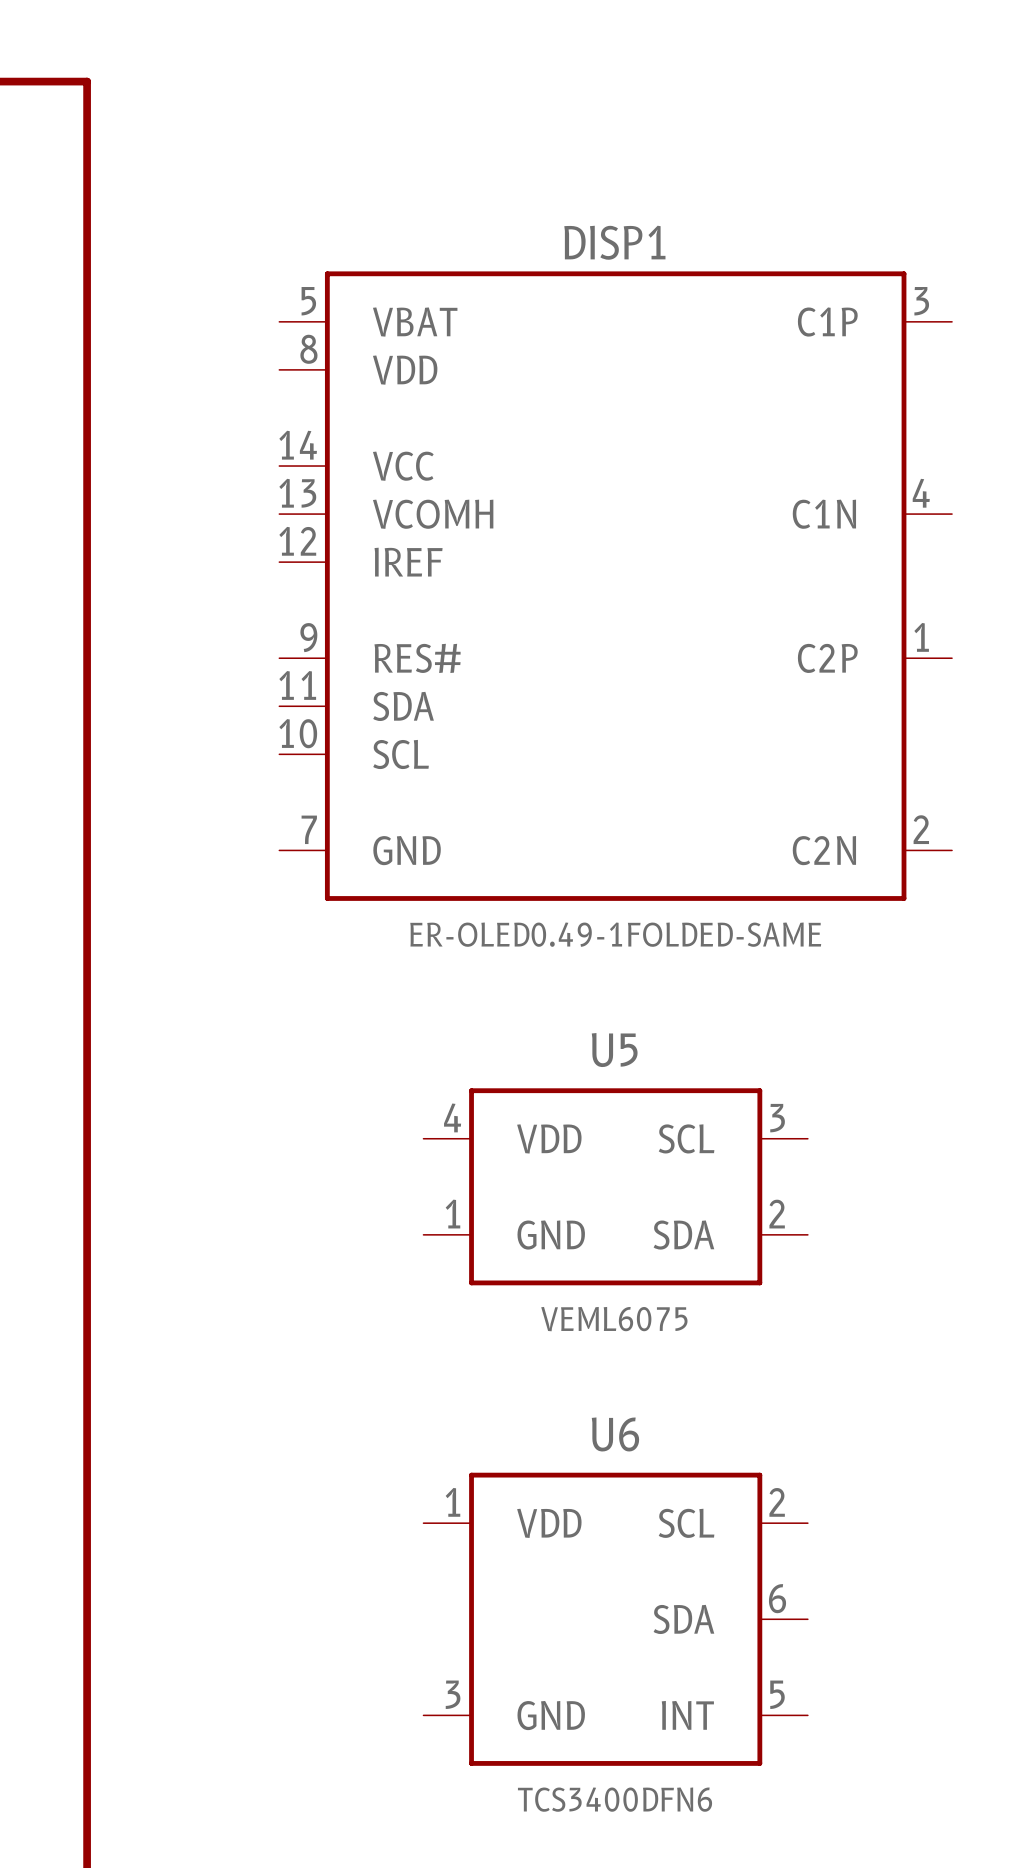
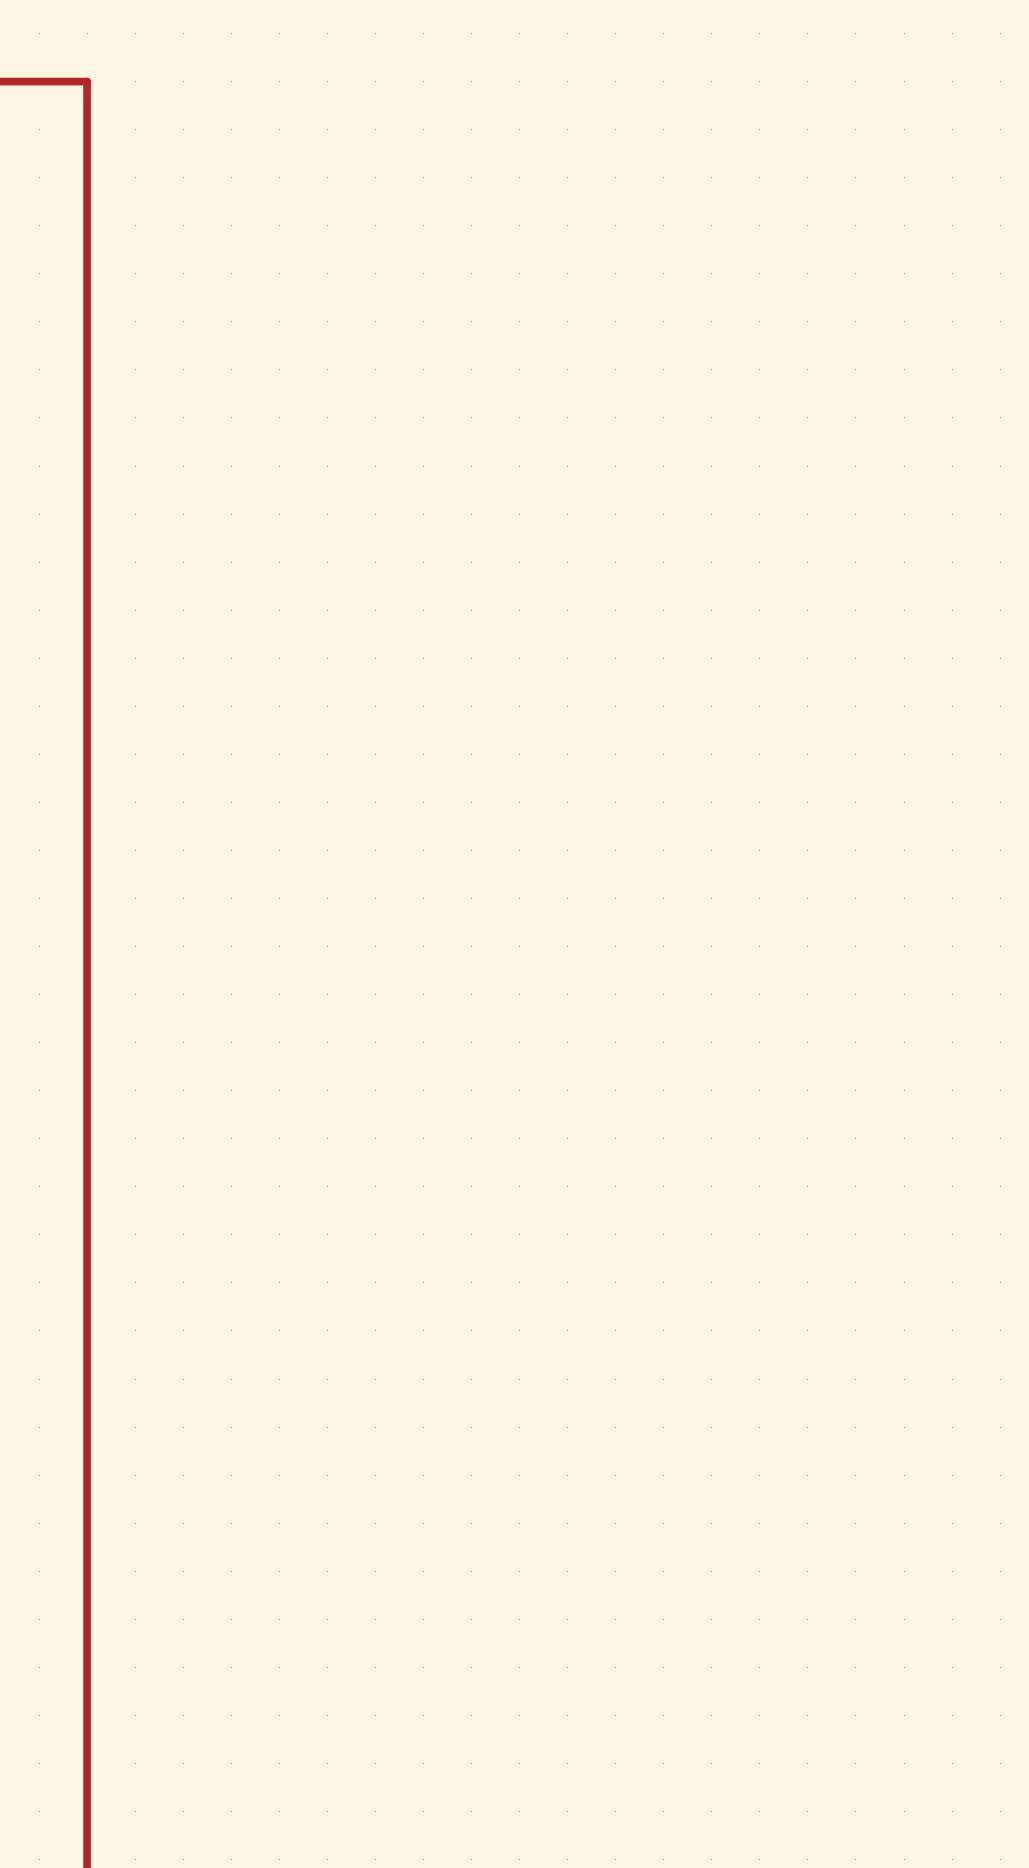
DISP1: ER-OLED0.49-1FOLDED-SAME (615, 586) -> none
U5: VEML6075 (615, 1186) -> none
U6: TCS3400DFN6 (615, 1619) -> none

